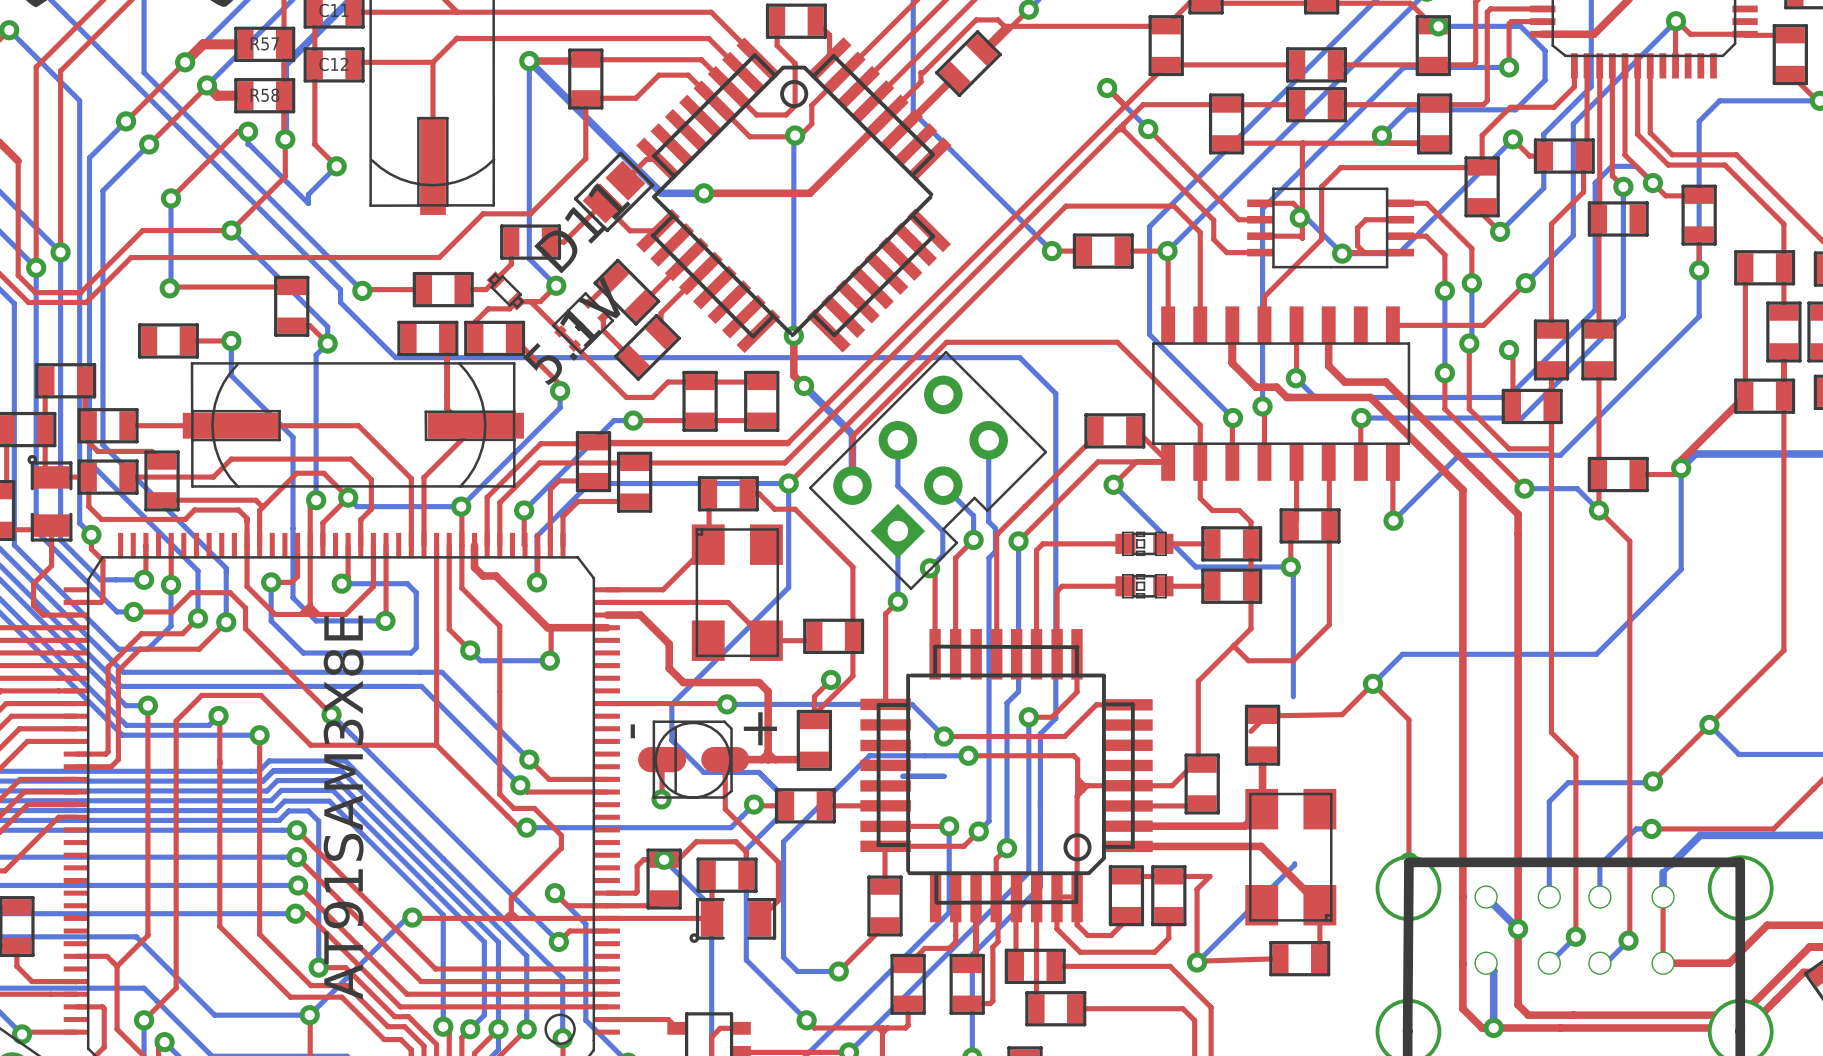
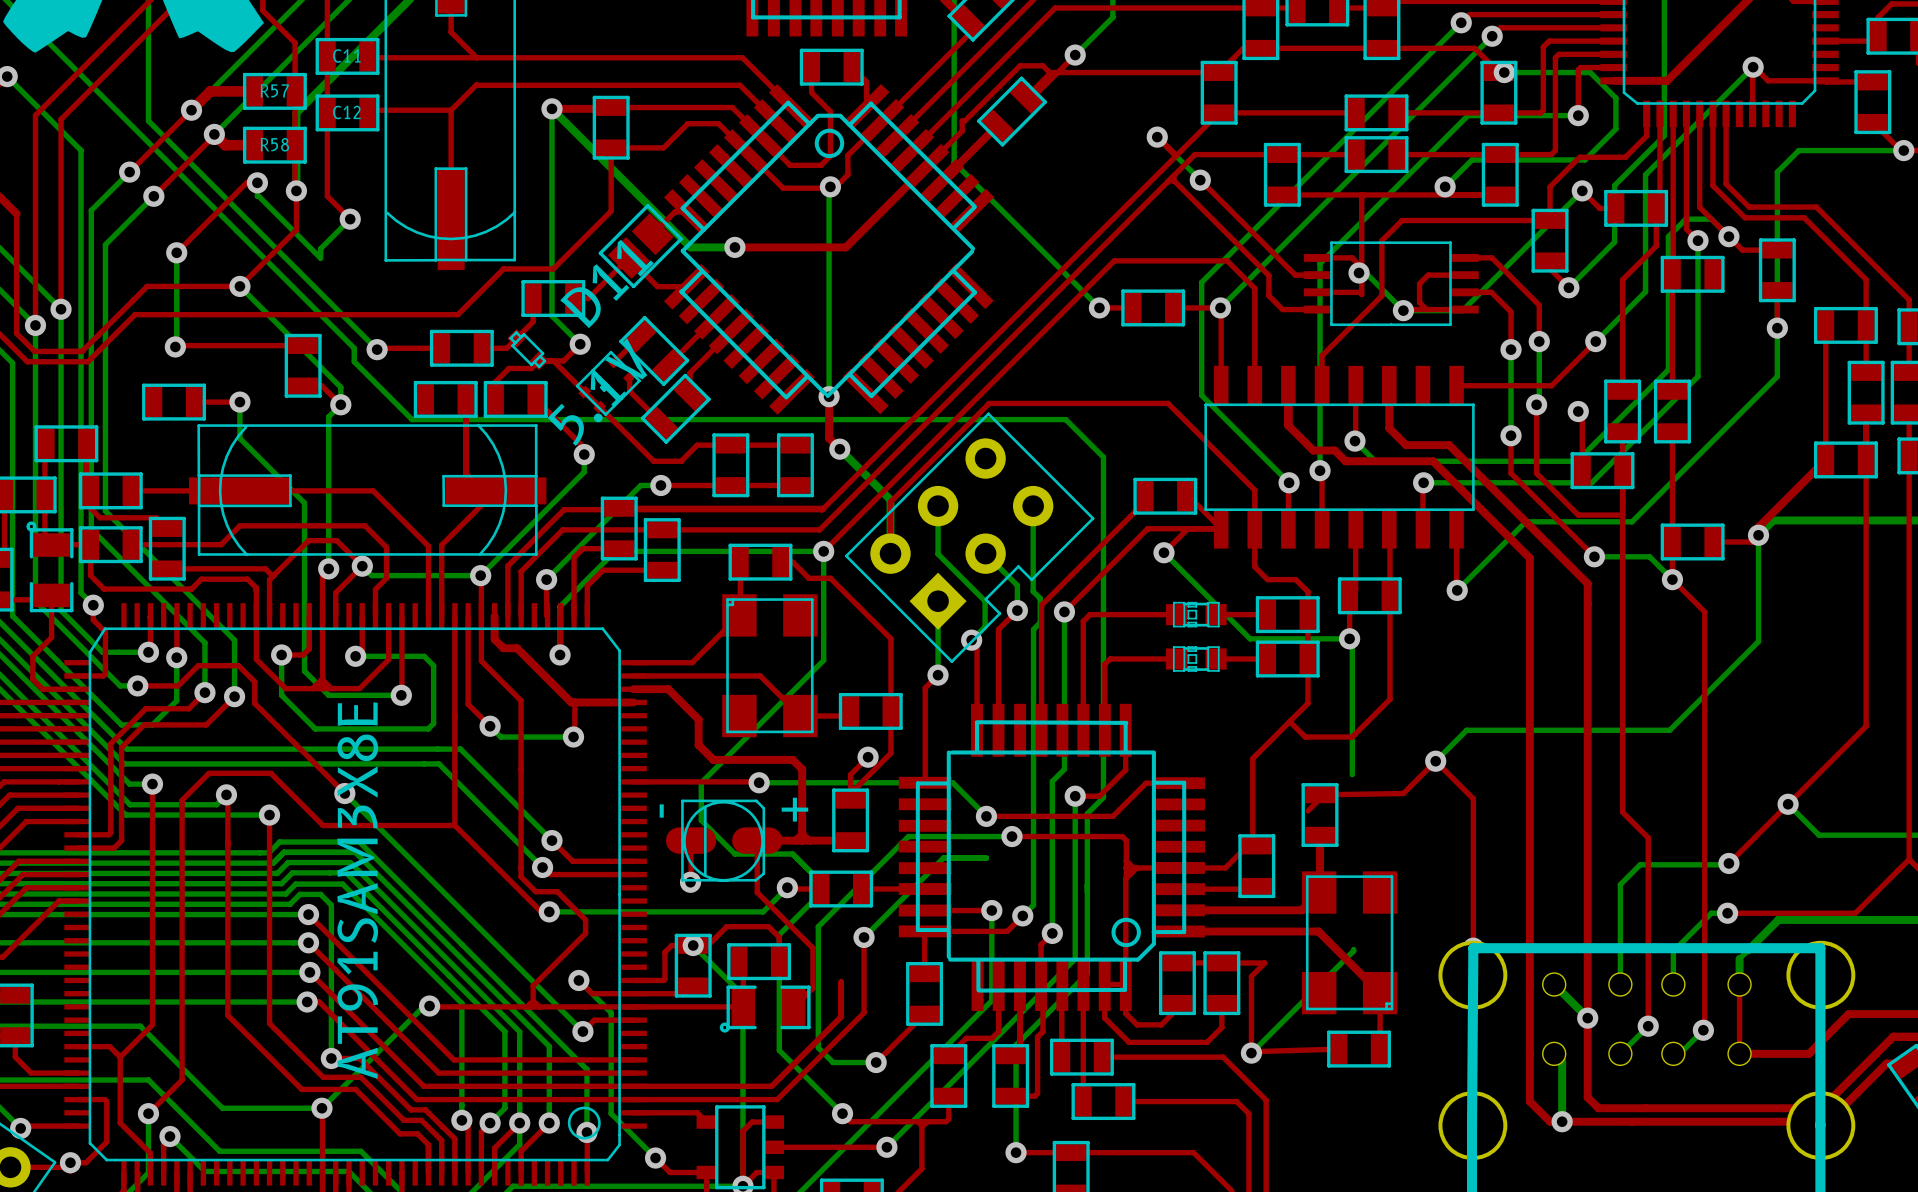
bottom track: none -> (943, 858) (864, 937)
top track: none -> (864, 937) (864, 1012) (777, 1099) (633, 1099)
via: none -> (864, 937)
top track: none -> (841, 981) (841, 1016) (771, 1086) (633, 1086)

